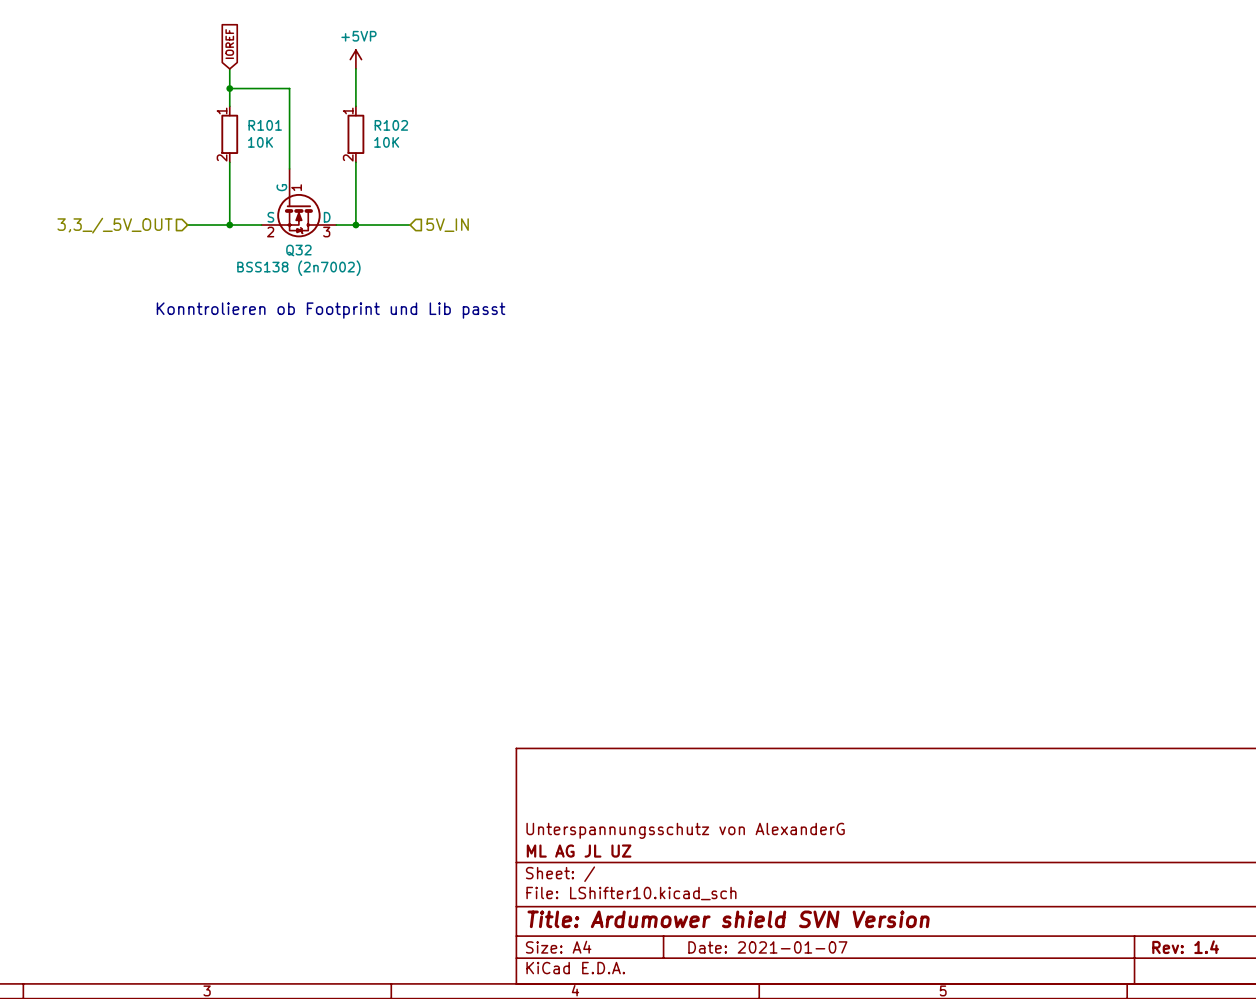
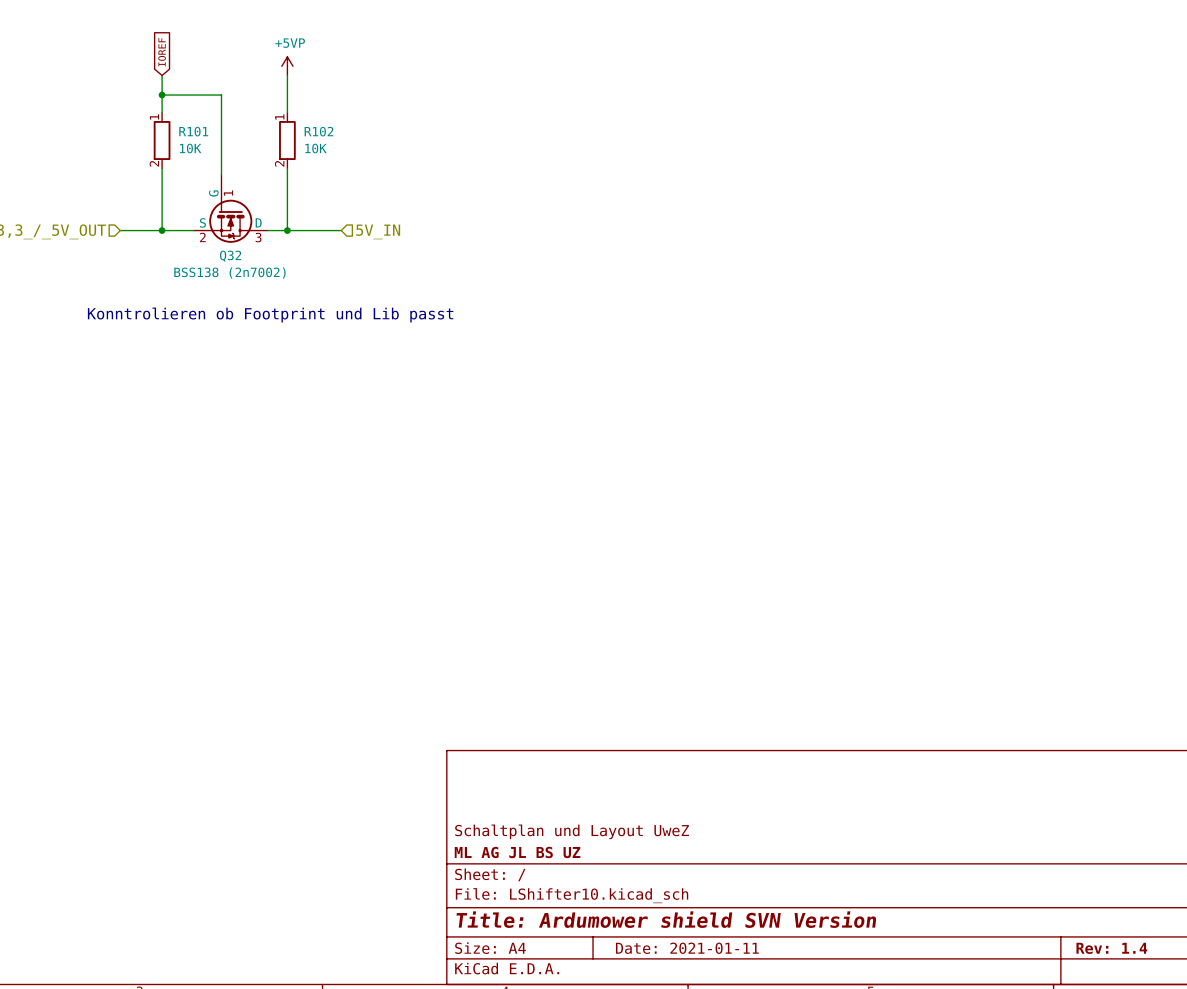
title block: Unterspannungsschutz von AlexanderG (685, 830) -> Schaltplan und Layout UweZ (572, 831)
title block: ML AG JL UZ (579, 851) -> ML AG JL BS UZ (517, 852)
title block: Date: 2021-01-07 (767, 947) -> Date: 2021-01-11 (687, 948)

